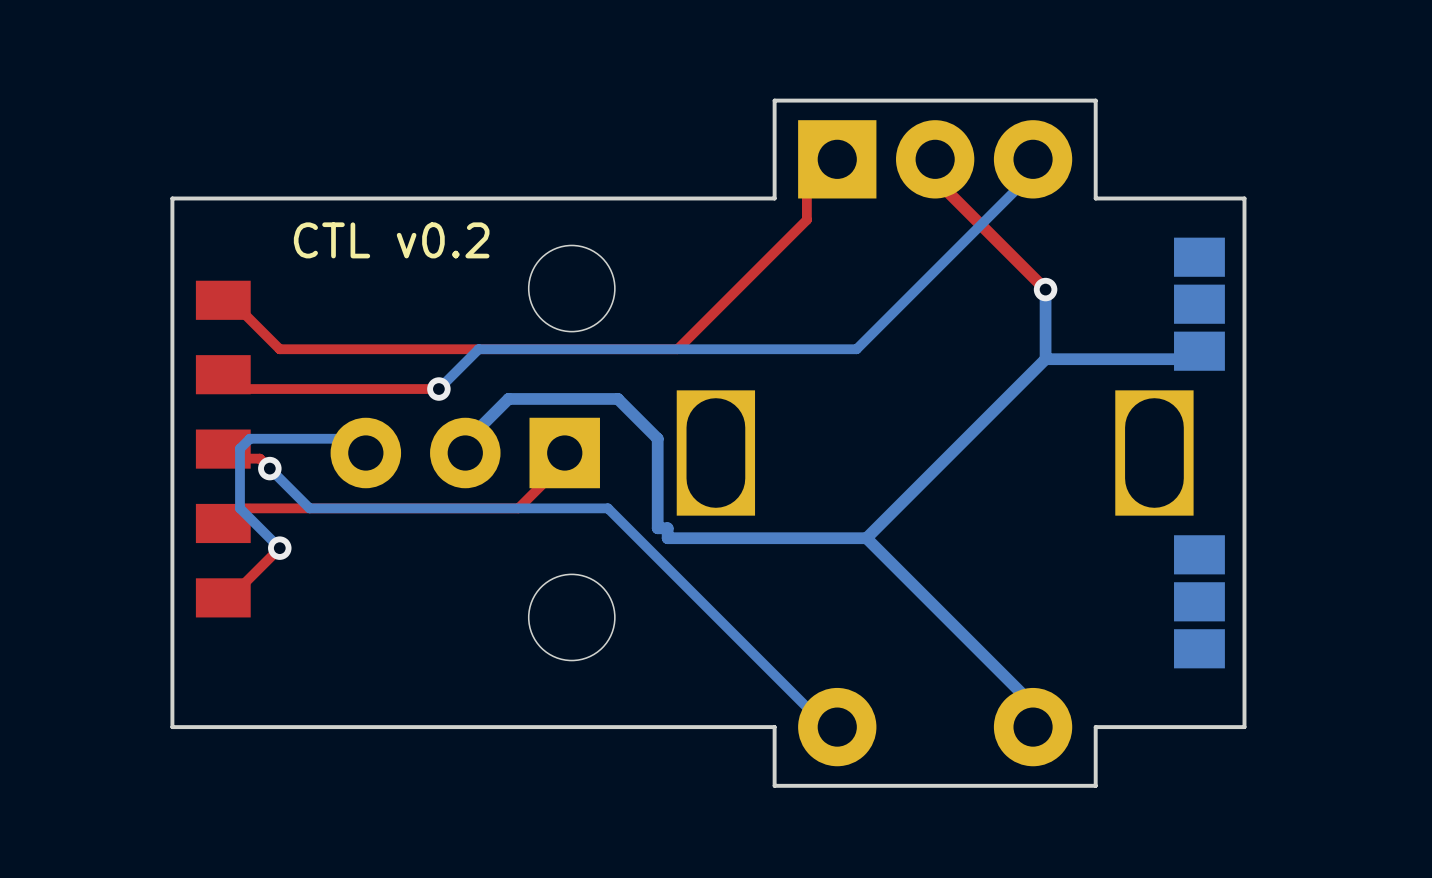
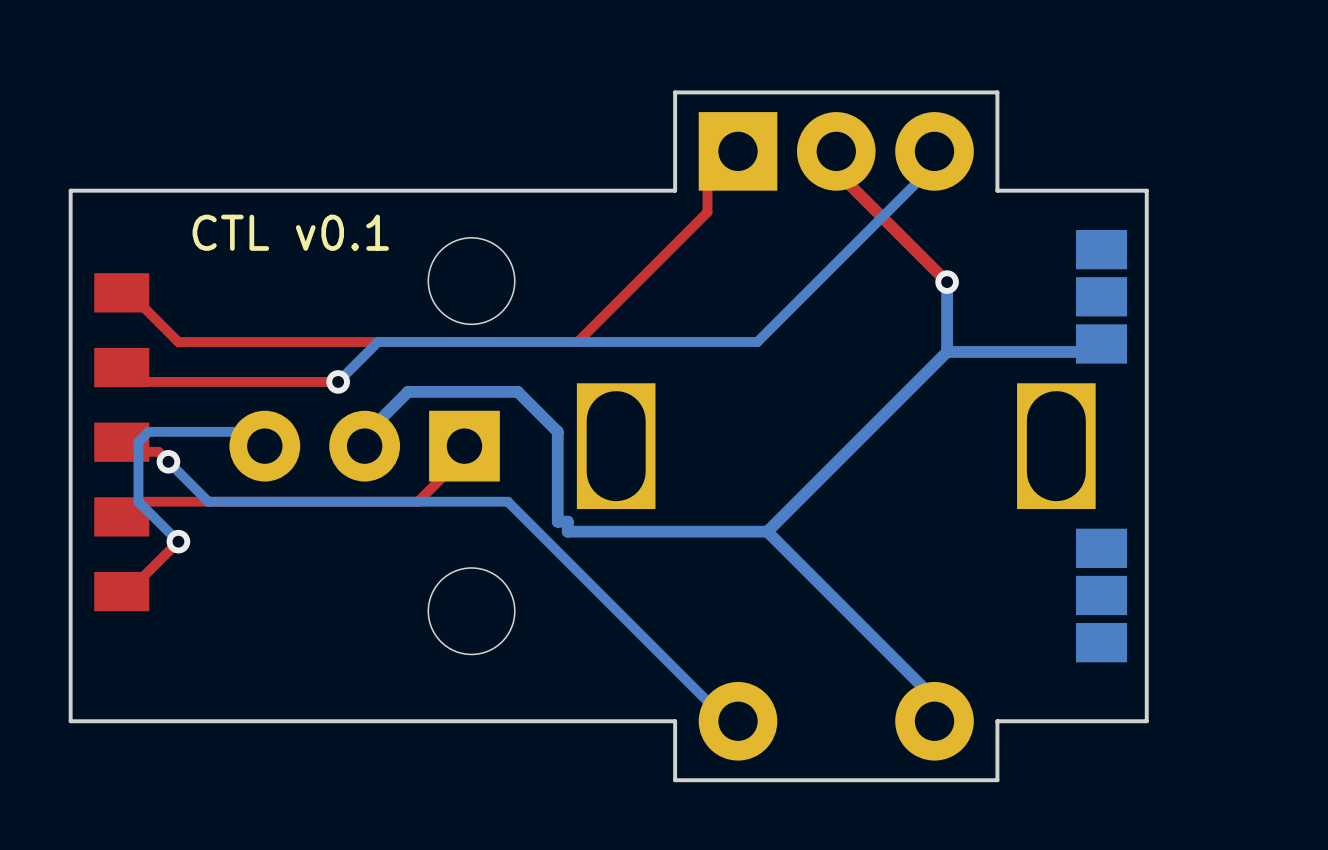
text: CTL v0.2 (391, 240) -> CTL v0.1 (290, 232)

